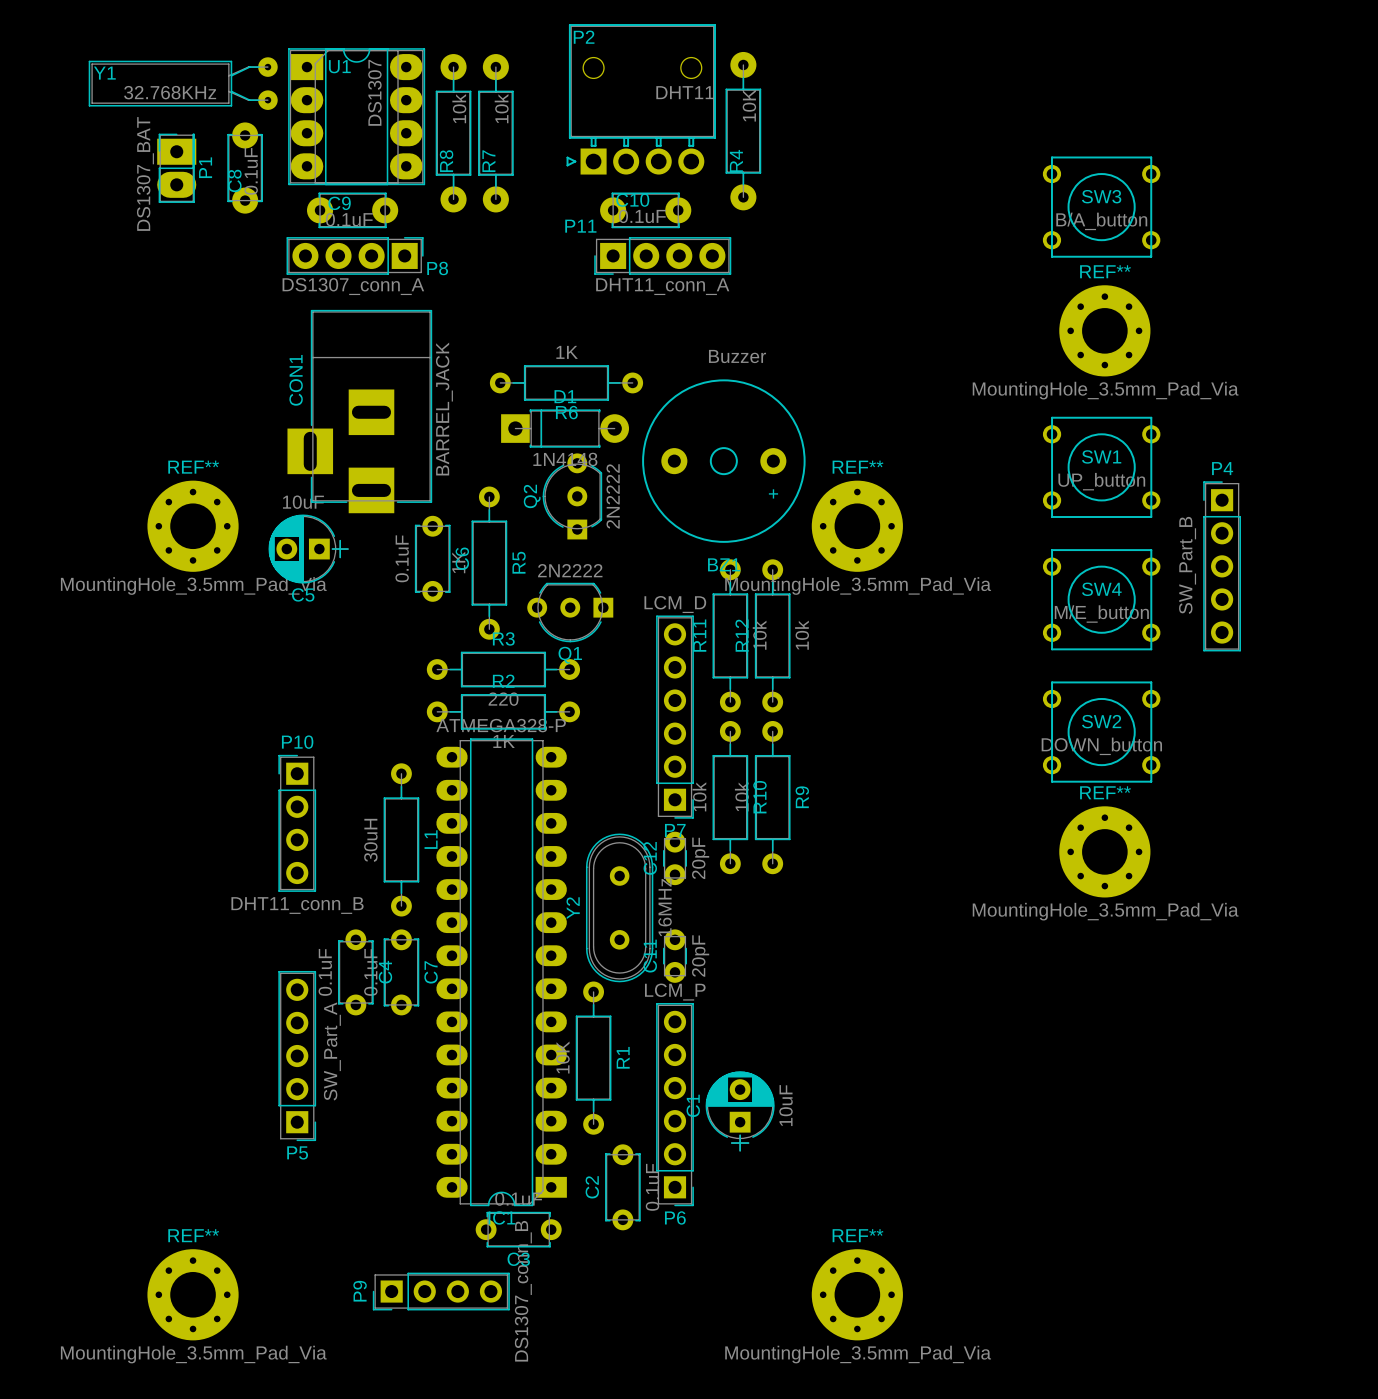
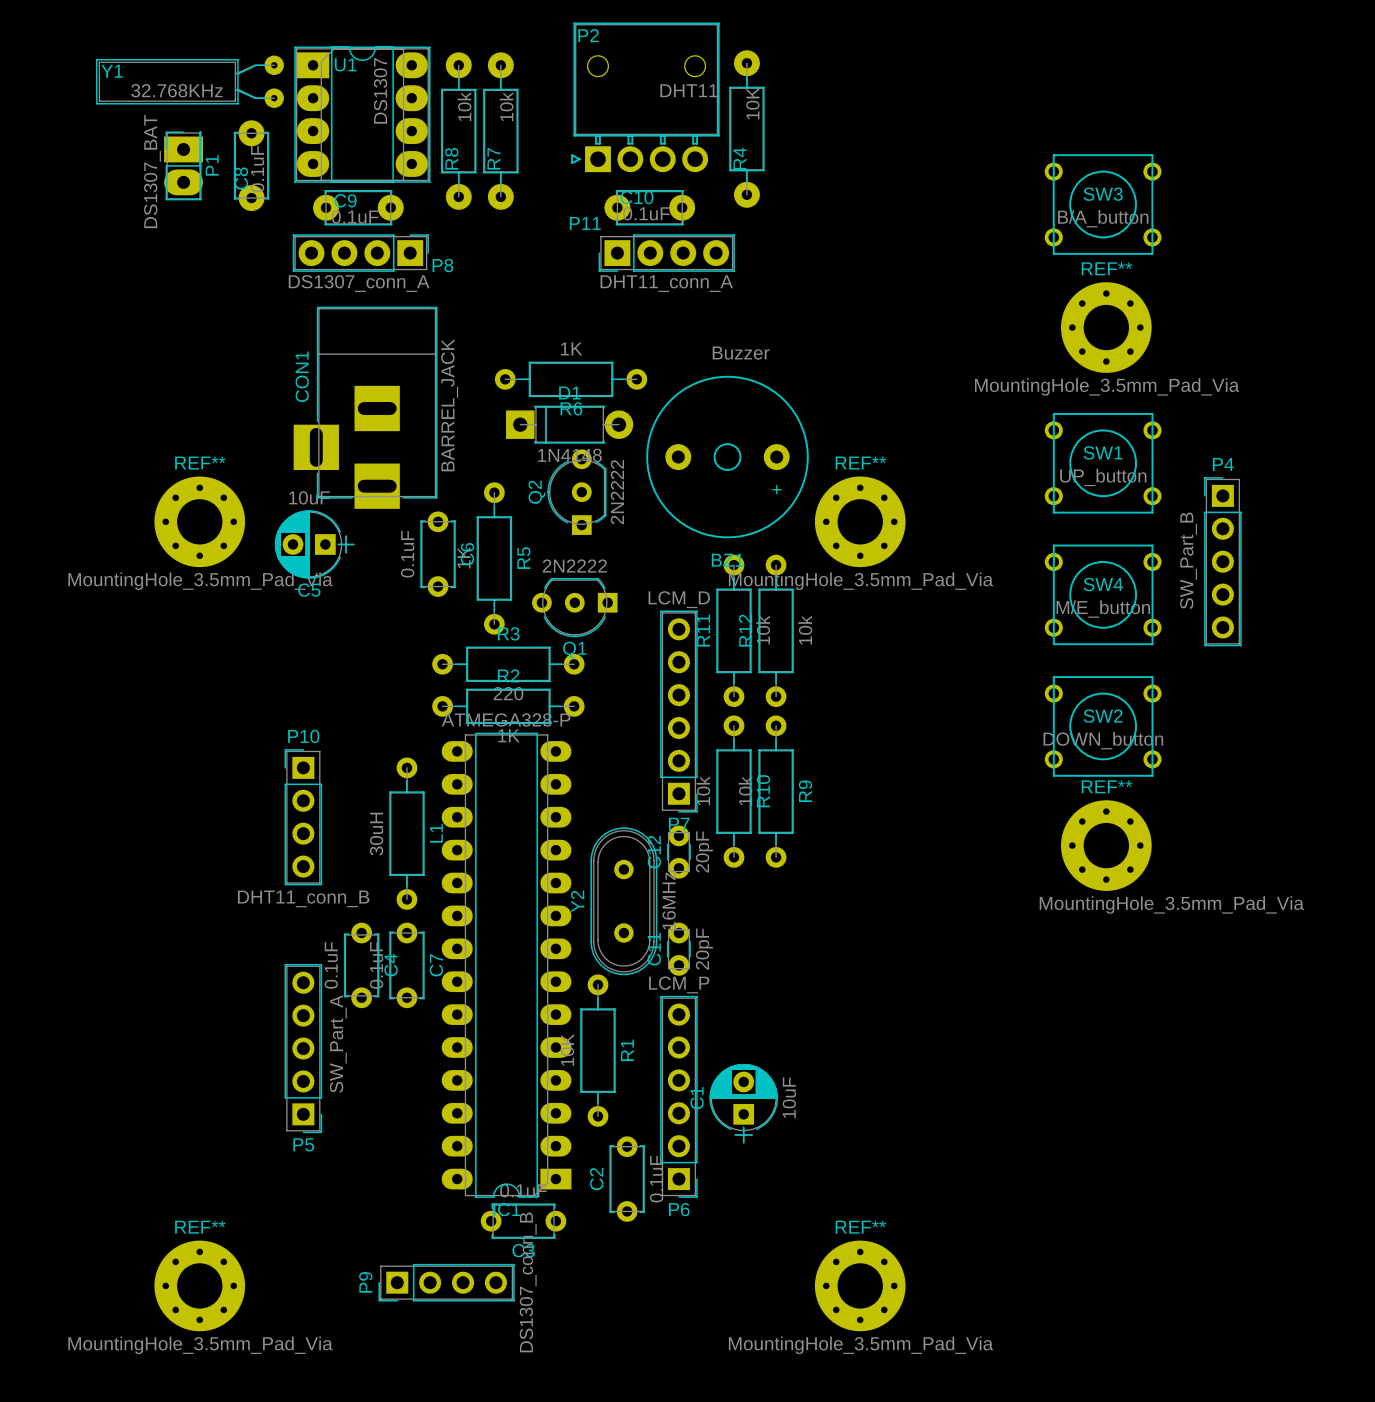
REF** value position: MountingHole_3.5mm_Pad_Via (1105, 911) -> MountingHole_3.5mm_Pad_Via (1171, 905)

